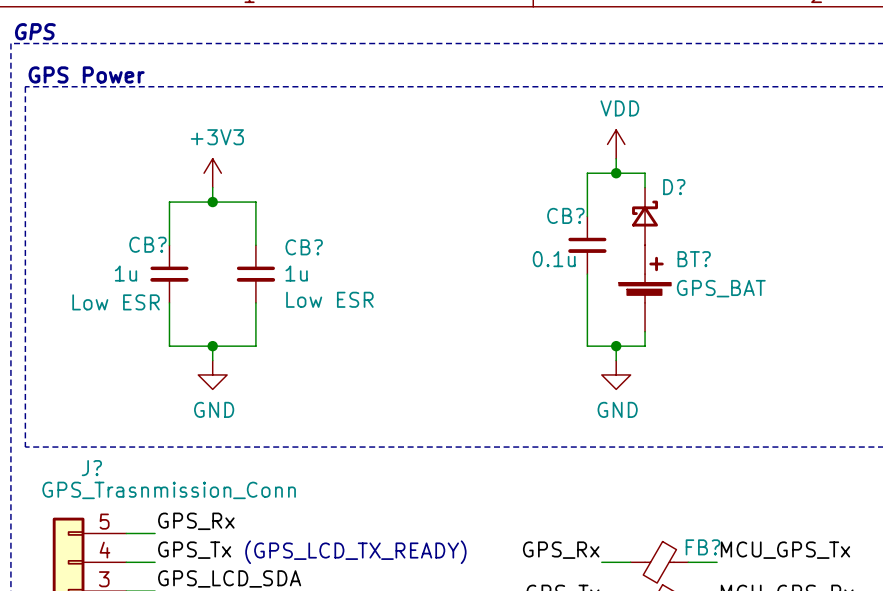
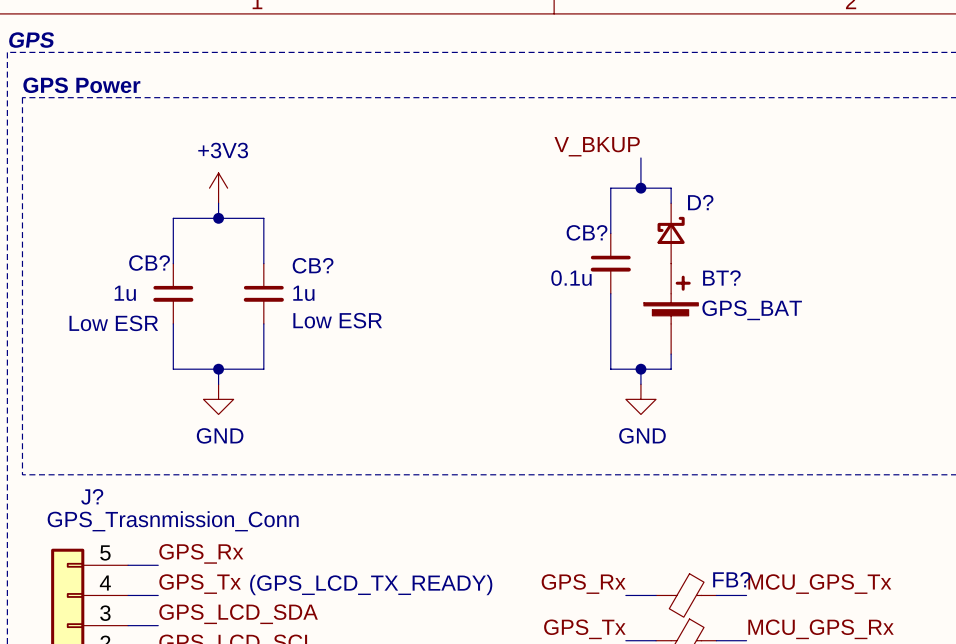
label: none -> V_BKUP (597, 146)
power symbol: VDD (616, 144) -> none

